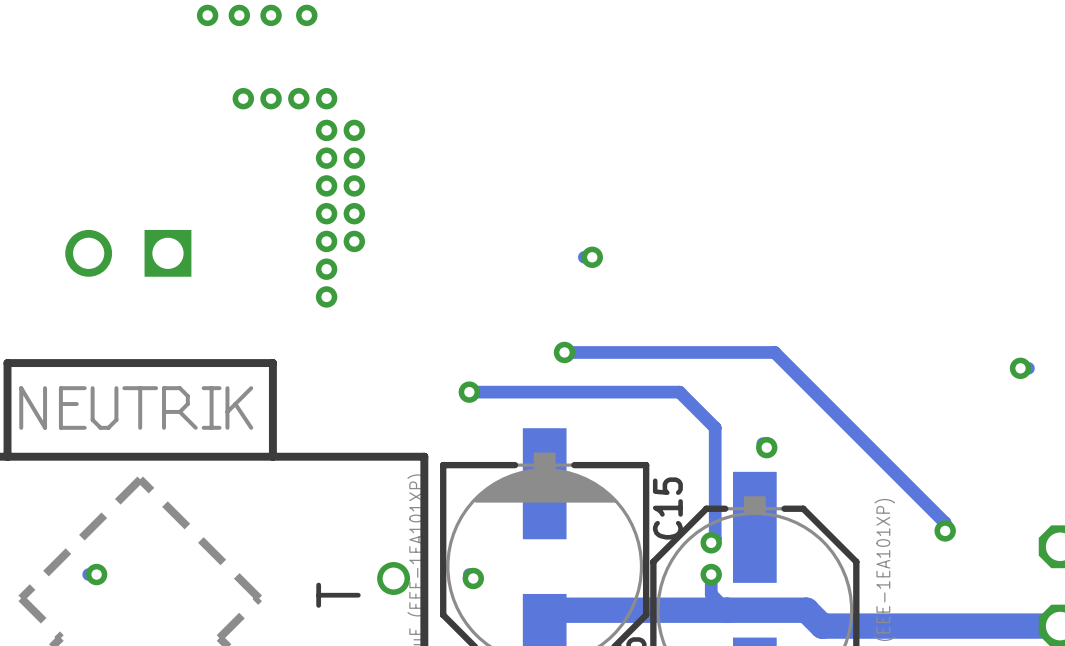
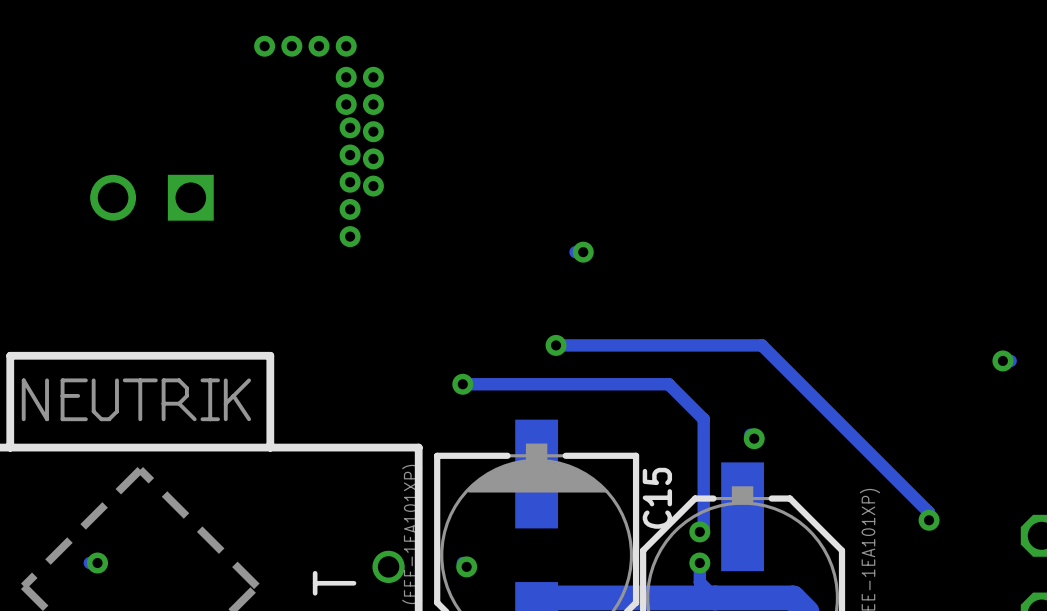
via: (207, 15) -> none
via: (239, 15) -> none
via: (271, 15) -> none
via: (306, 15) -> none
via: none -> (264, 46)
via: none -> (291, 46)
via: none -> (319, 46)
via: none -> (346, 46)
via: none -> (346, 77)
via: none -> (373, 77)
via: (243, 98) -> none
via: (271, 98) -> none
via: (298, 98) -> none
via: (326, 98) -> none
via: none -> (346, 104)
via: none -> (373, 104)
via: (326, 130) -> none
via: none -> (373, 131)
via: (326, 158) -> none
via: none -> (373, 158)
via: (326, 185) -> none
via: none -> (373, 186)
via: (326, 213) -> none
via: (326, 241) -> none
part position: (128, 253) -> (151, 197)
via: (326, 269) -> none
via: (326, 296) -> none

